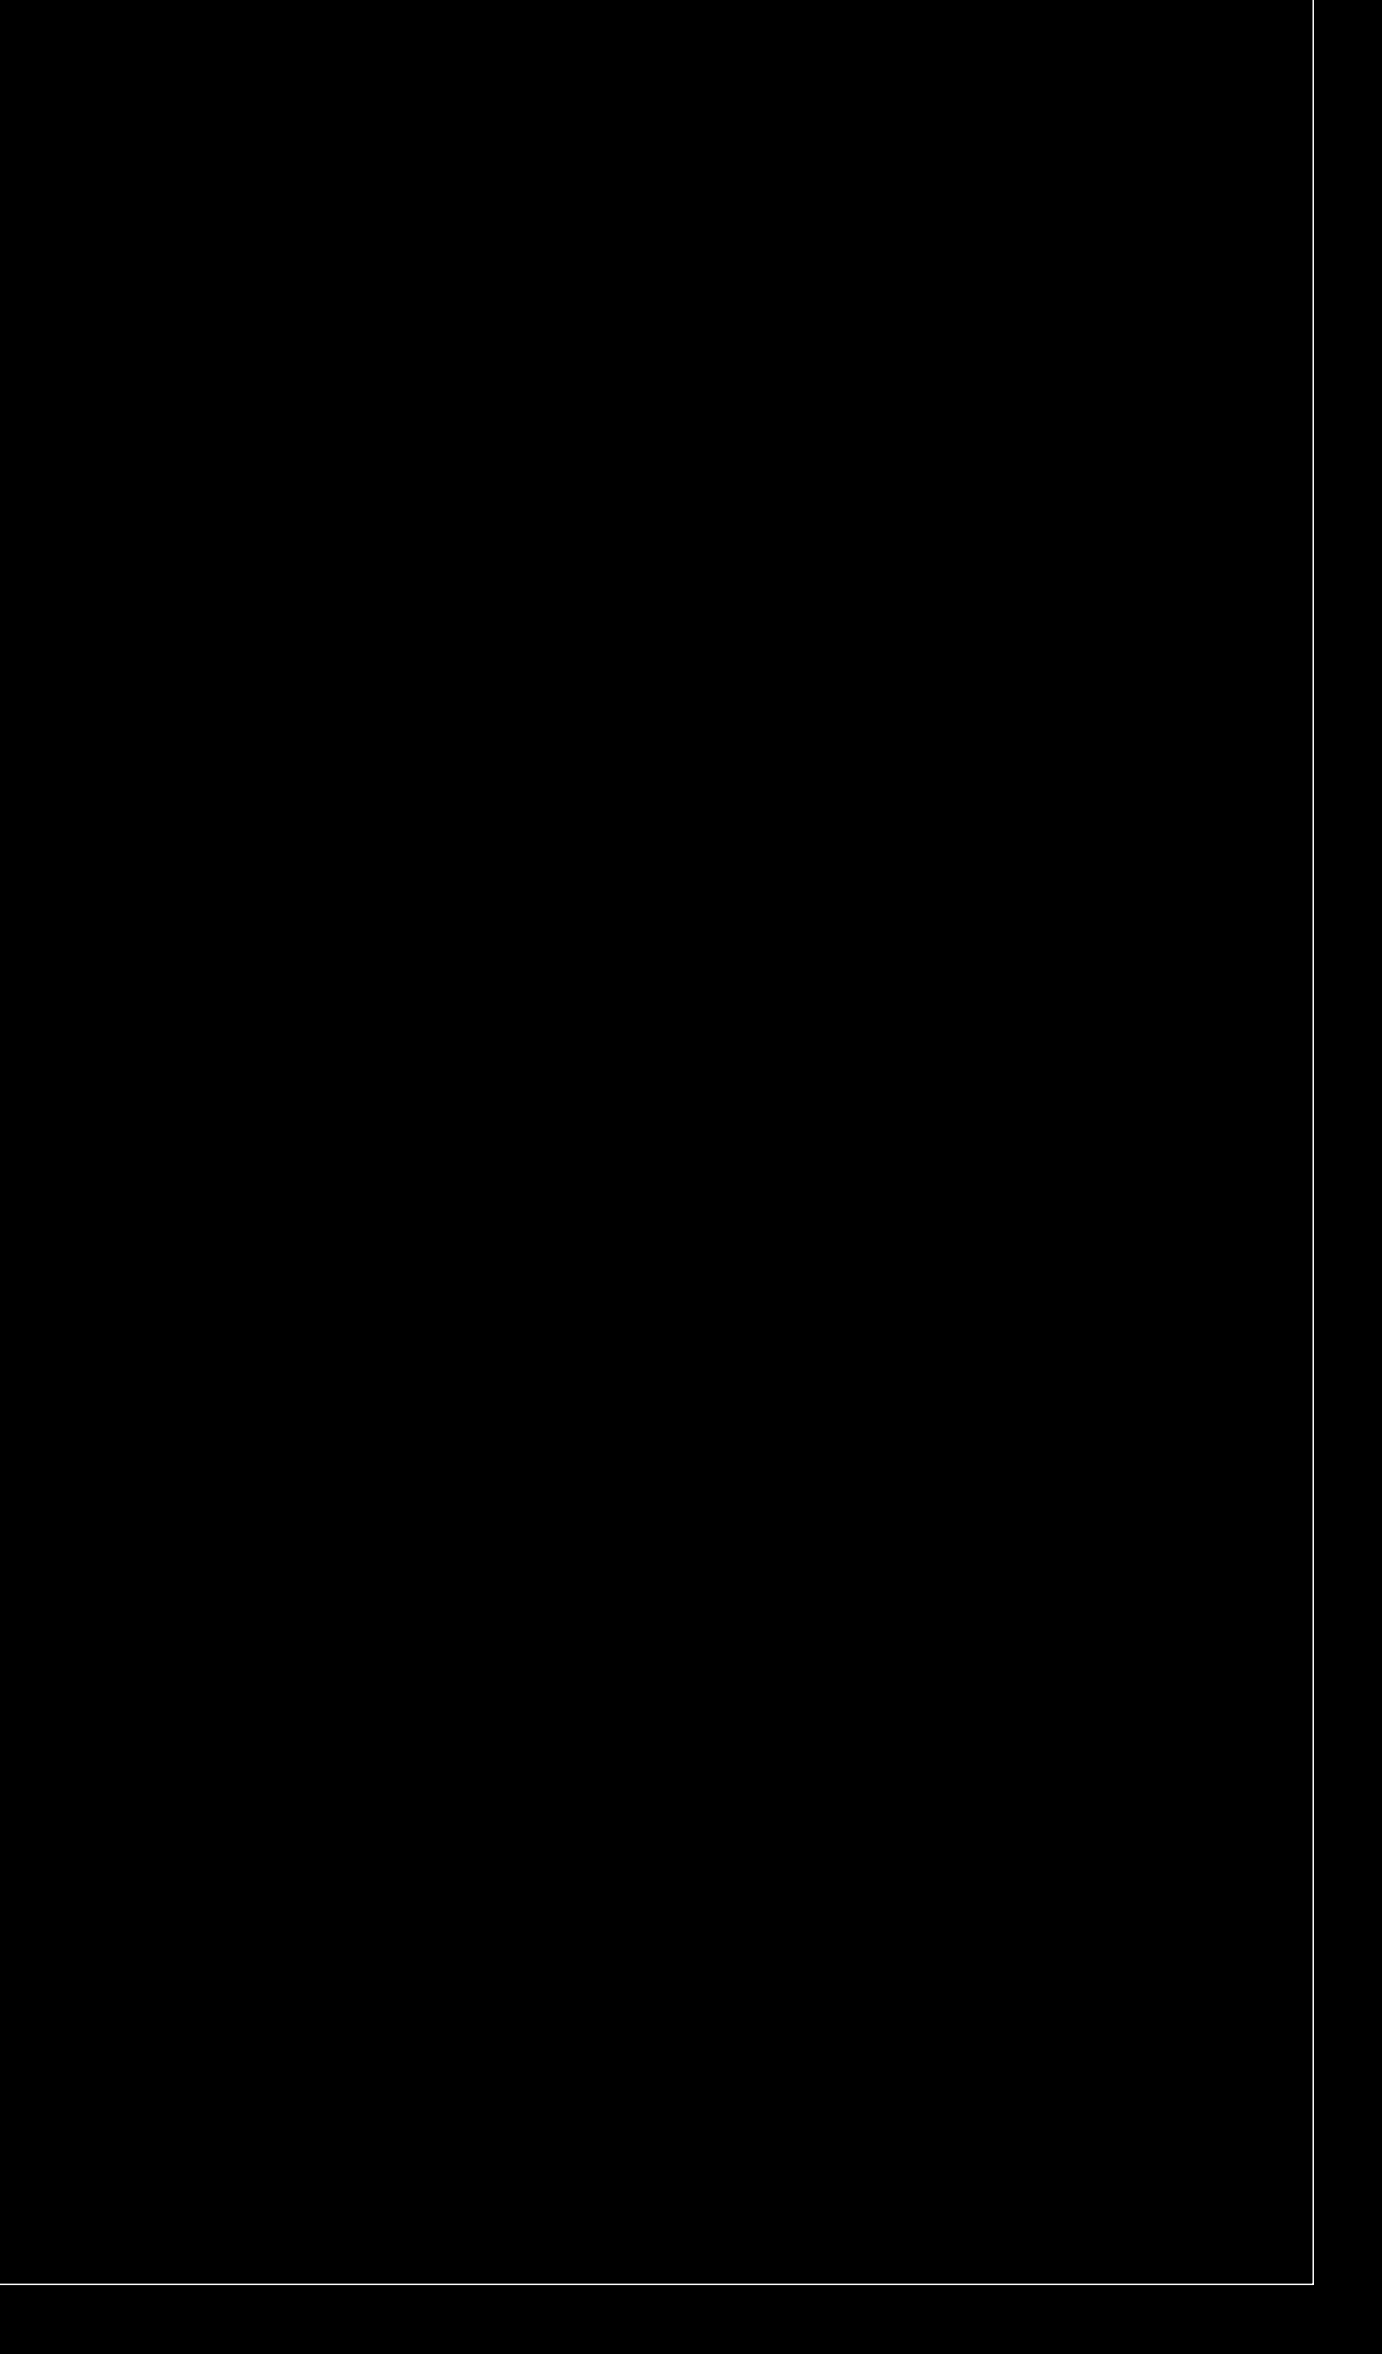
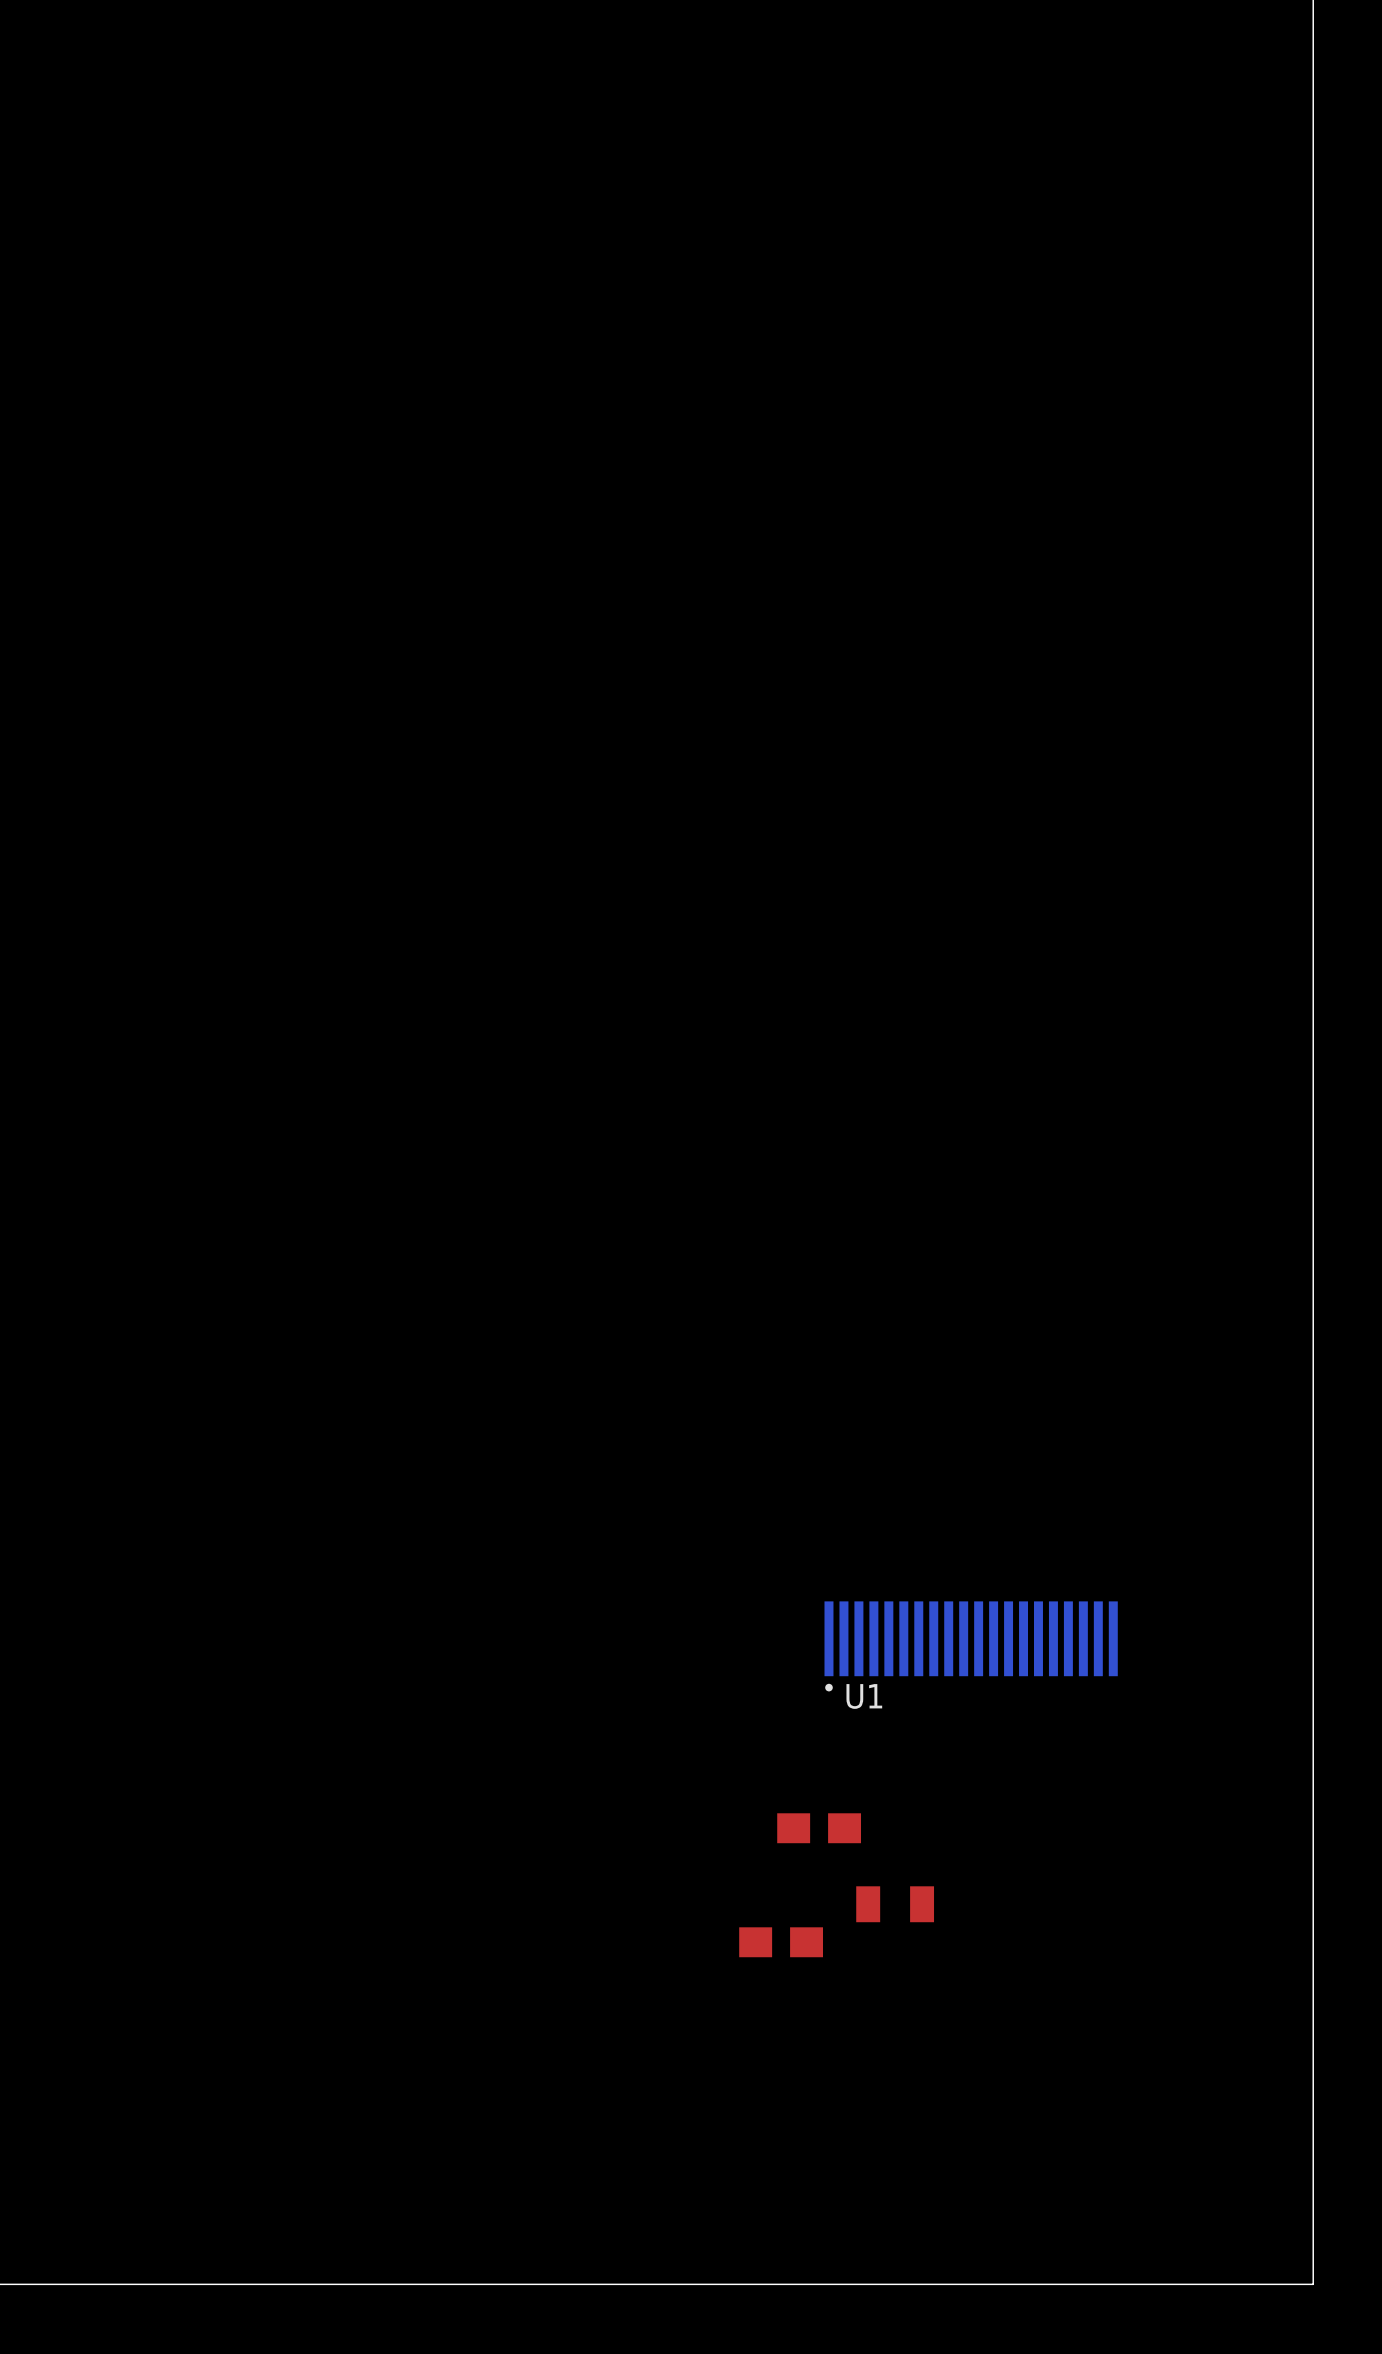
U1: none -> (971, 1646)
part: none -> (819, 1828)
part: none -> (895, 1904)
part: none -> (781, 1942)

